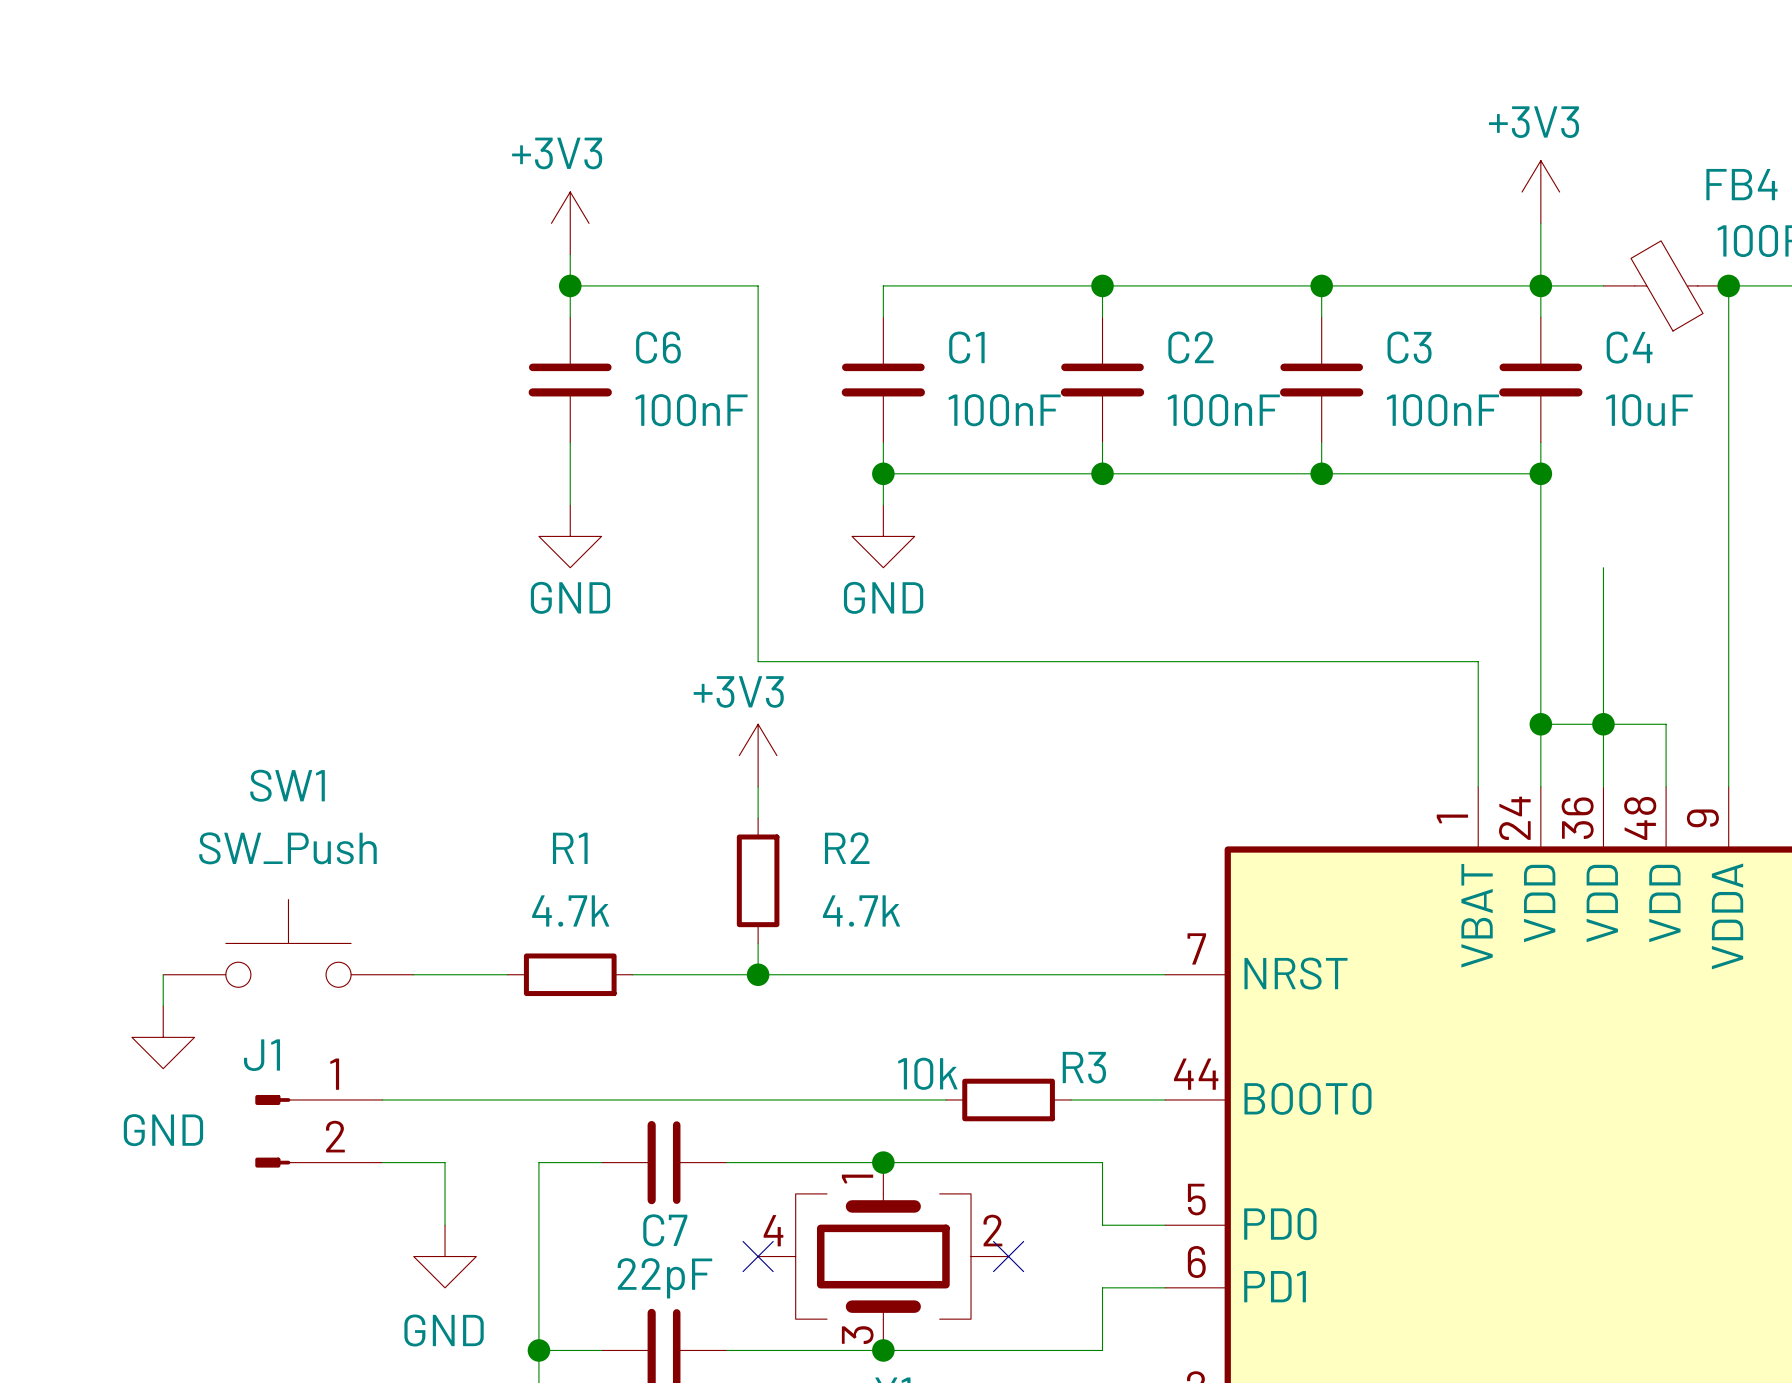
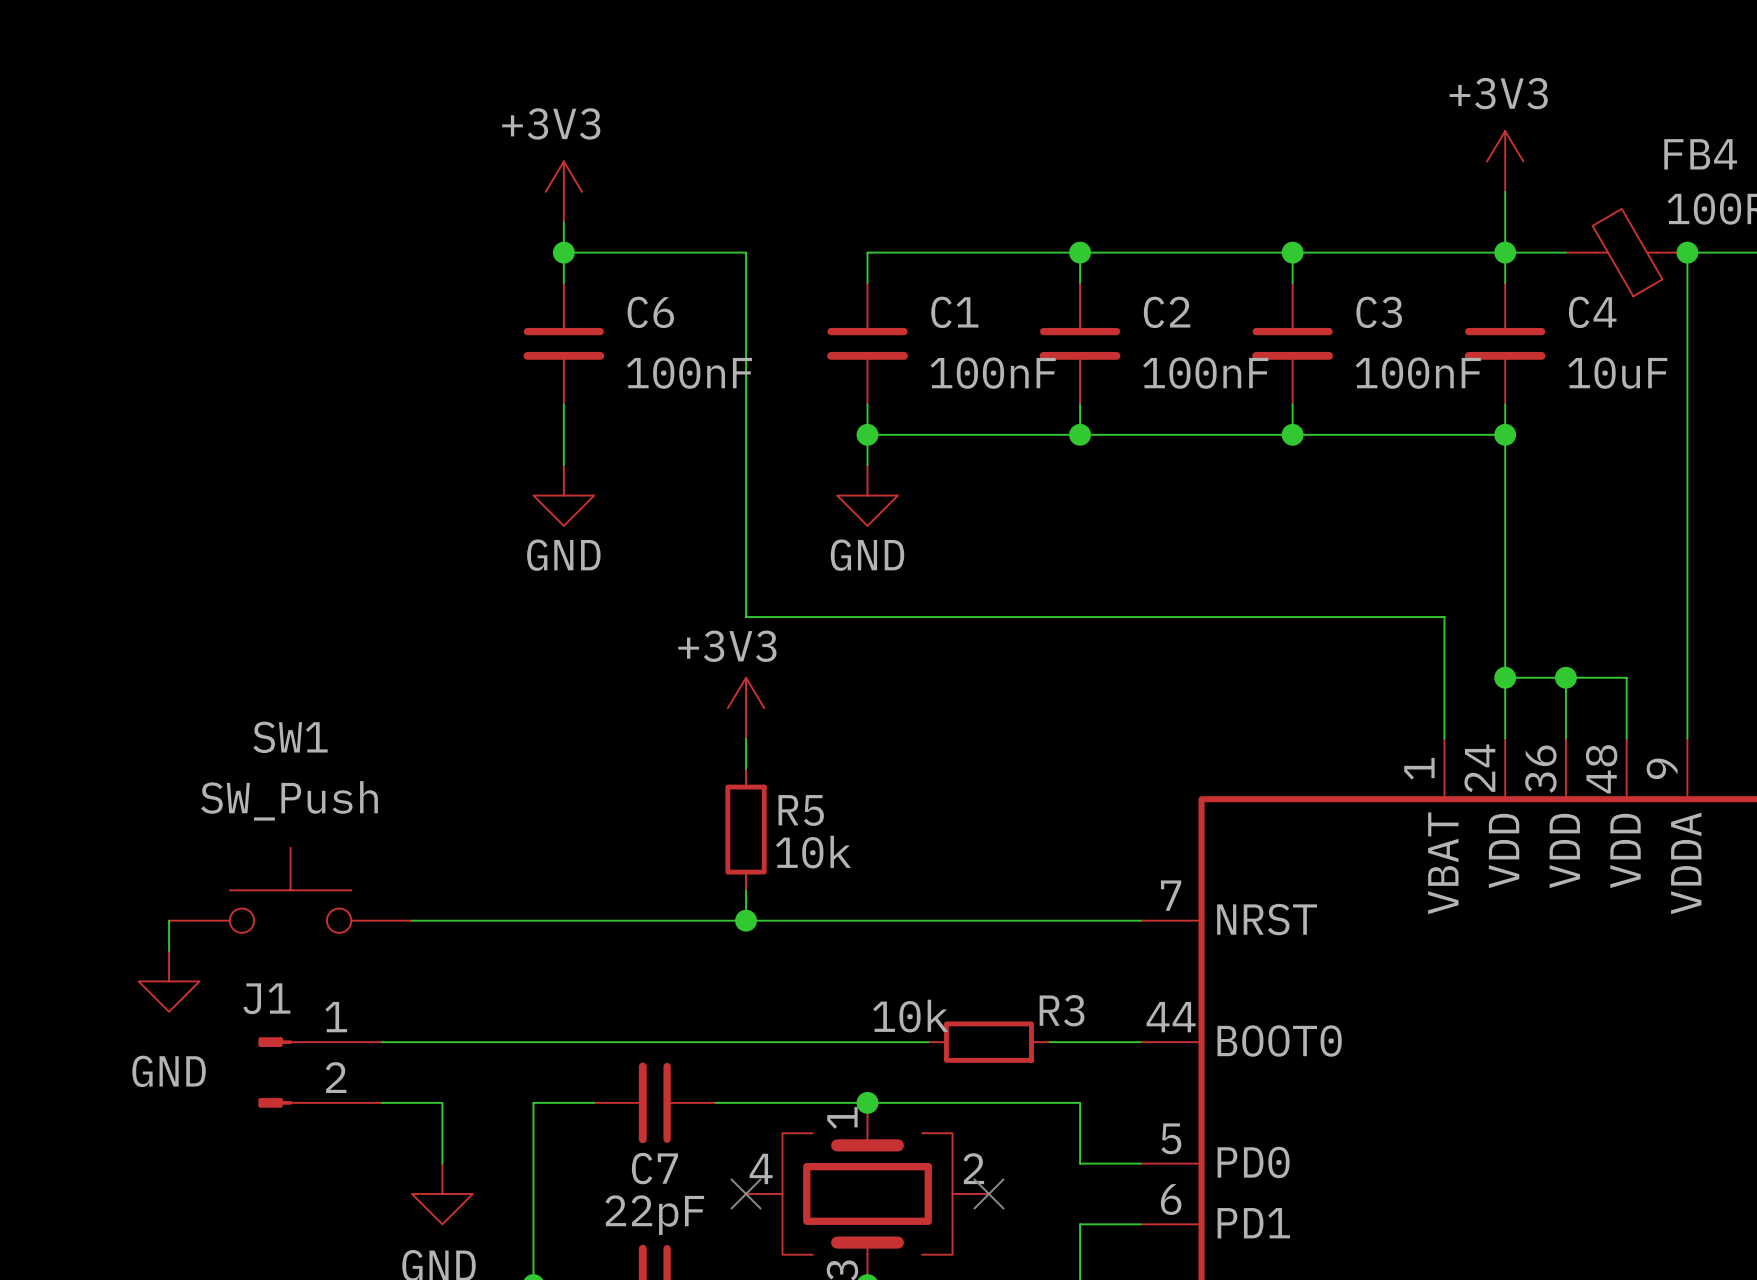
wire: (1603, 567) (1603, 724) -> none
R2 name: R2 (847, 848) -> R5 (801, 810)
R2 value: 4.7k (861, 911) -> 10k (813, 852)
wire: none -> (503, 920) (624, 920)
R1: 4.7k (570, 974) -> none

